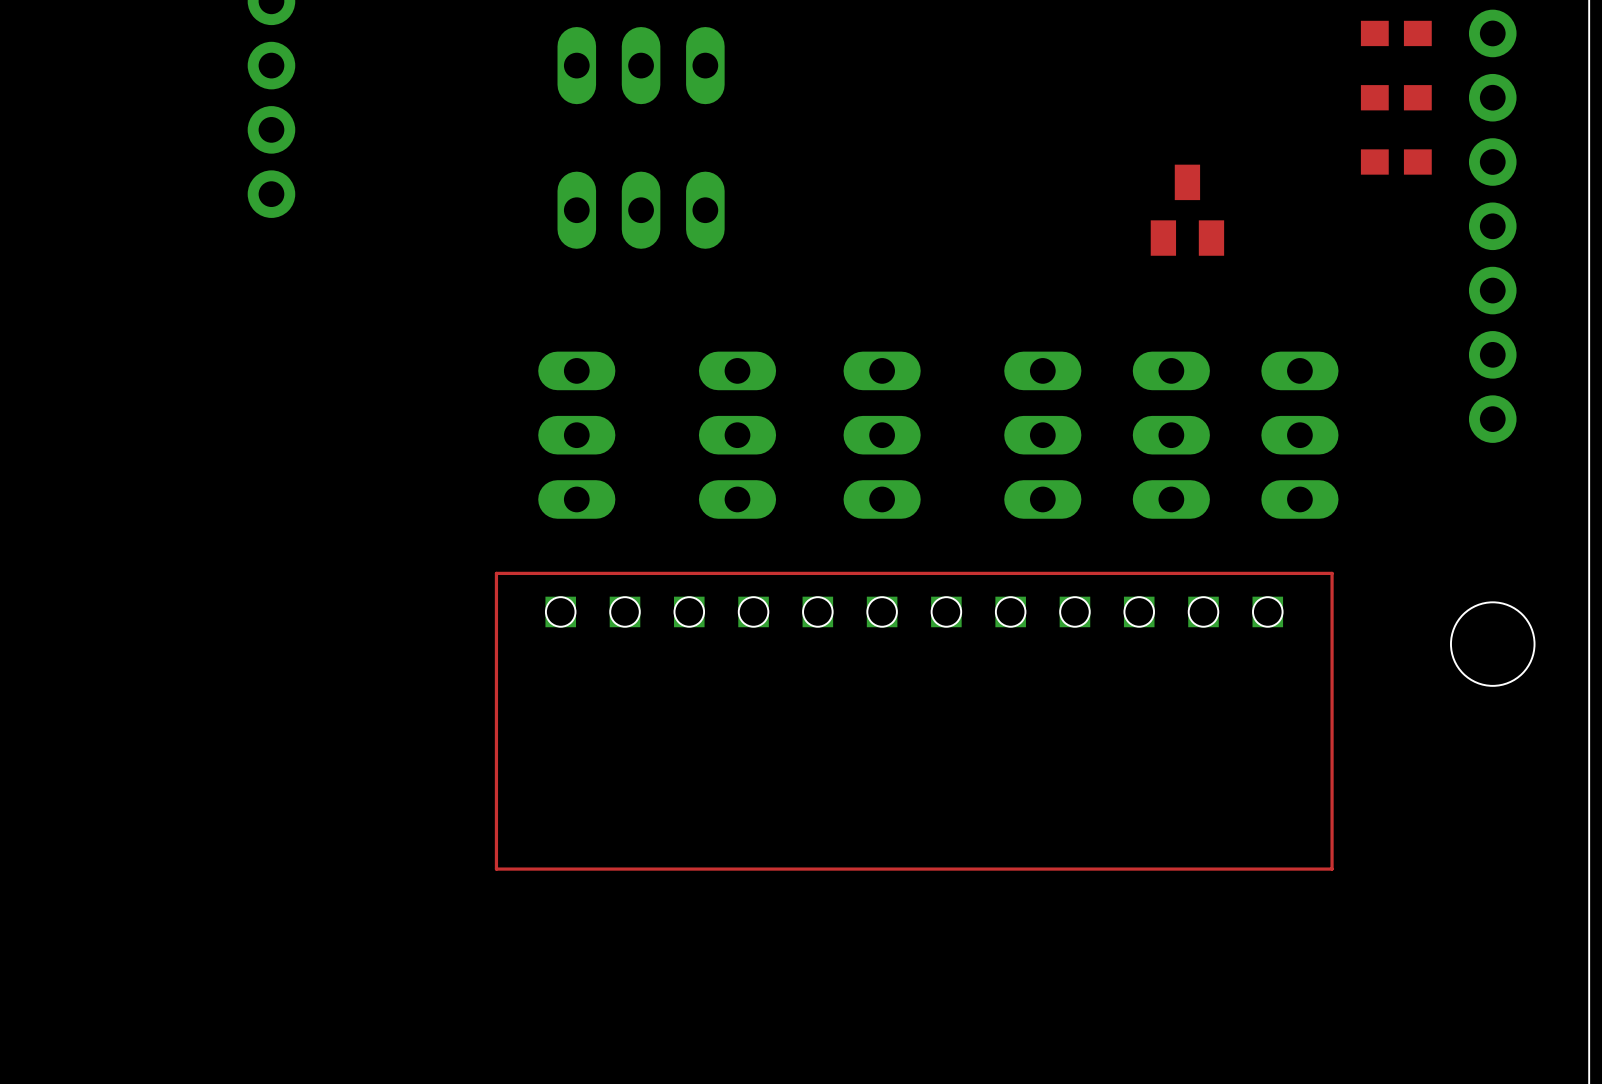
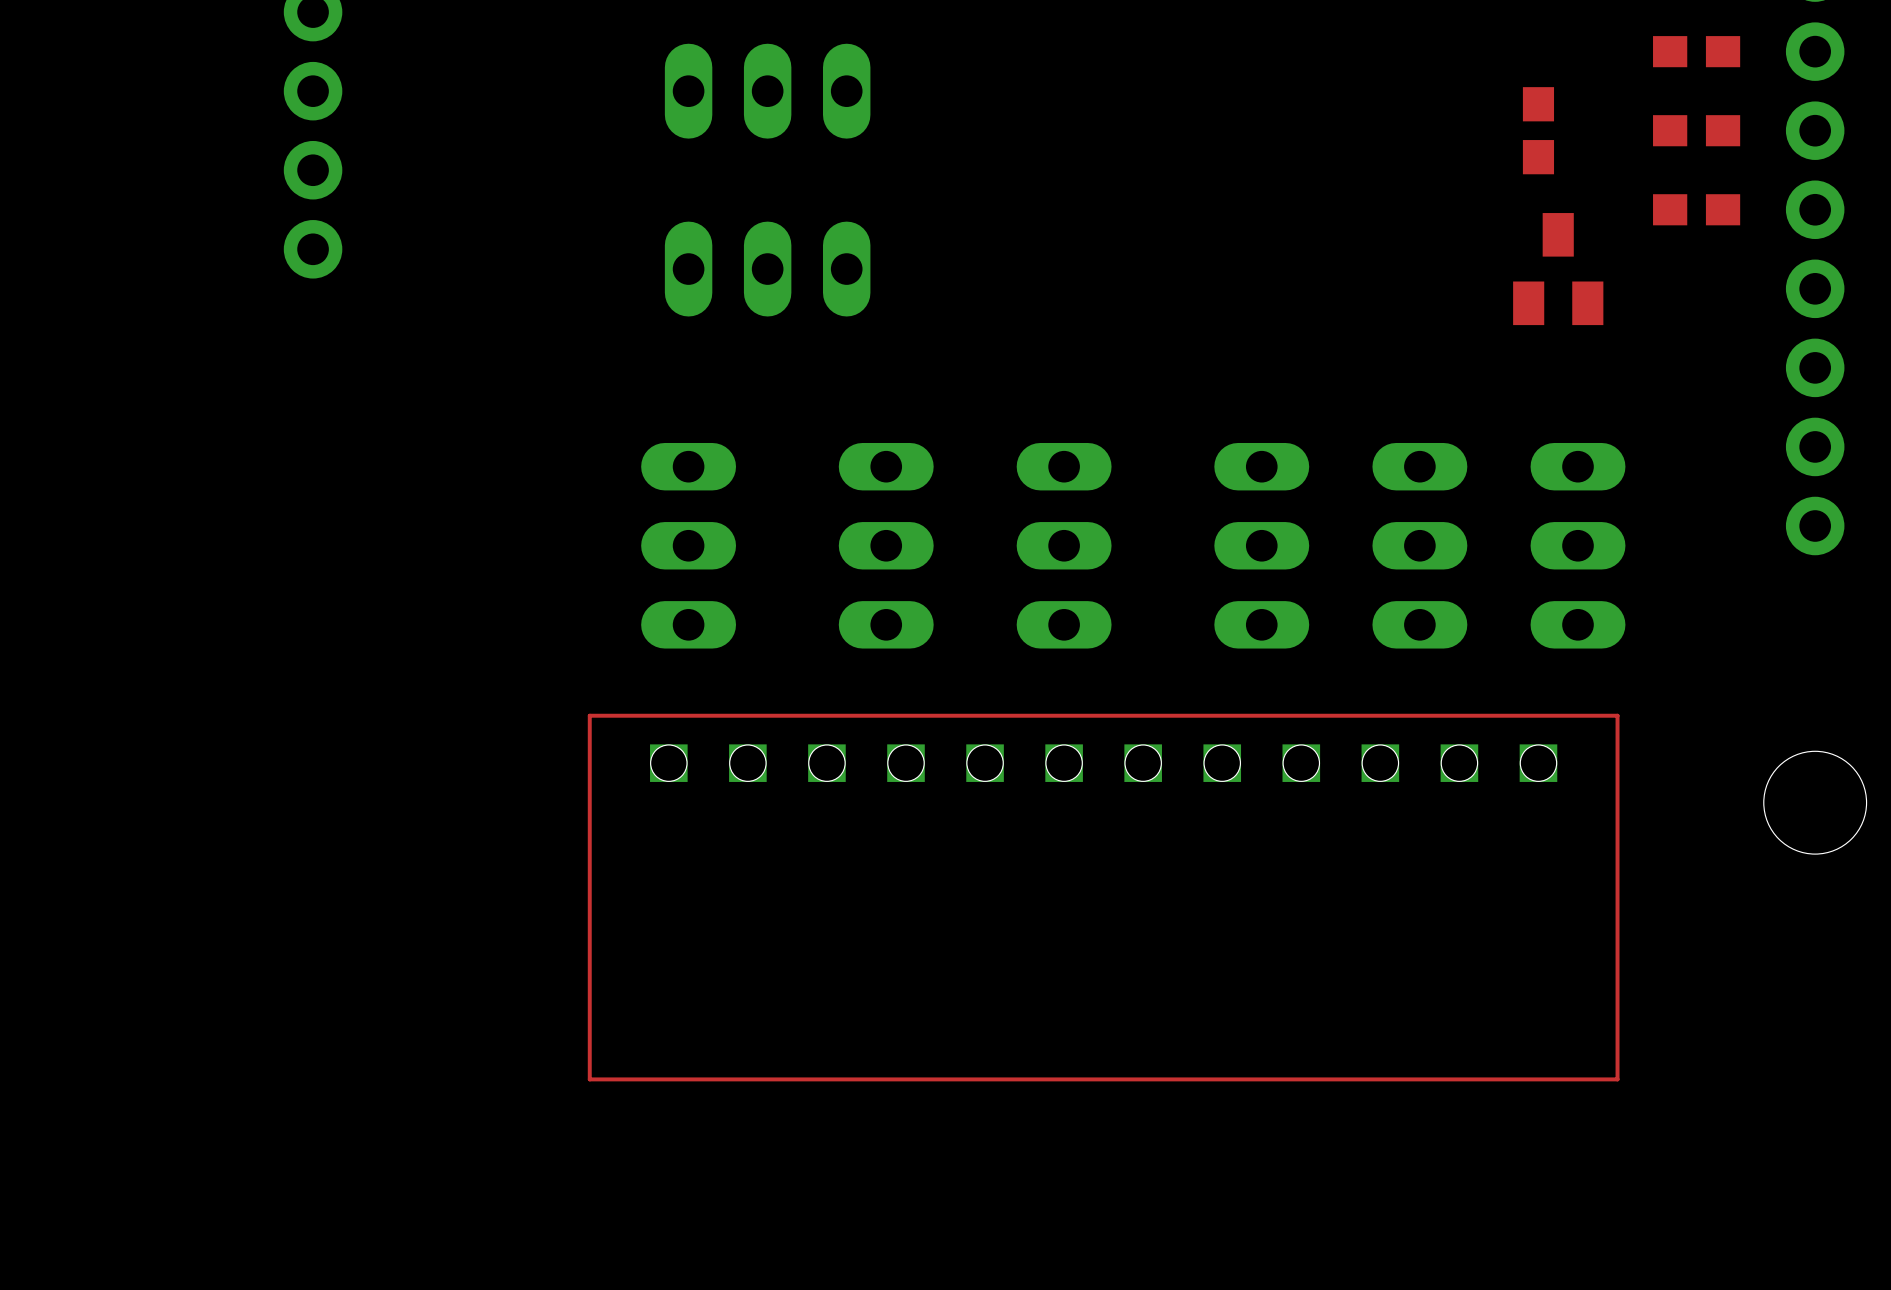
part: none -> (1538, 130)
part position: (1187, 210) -> (1558, 269)

